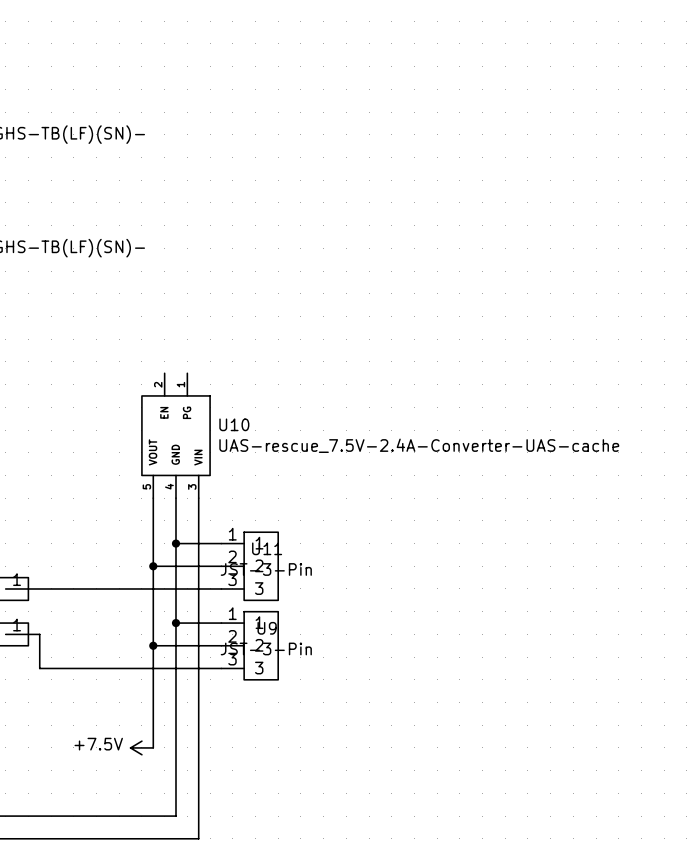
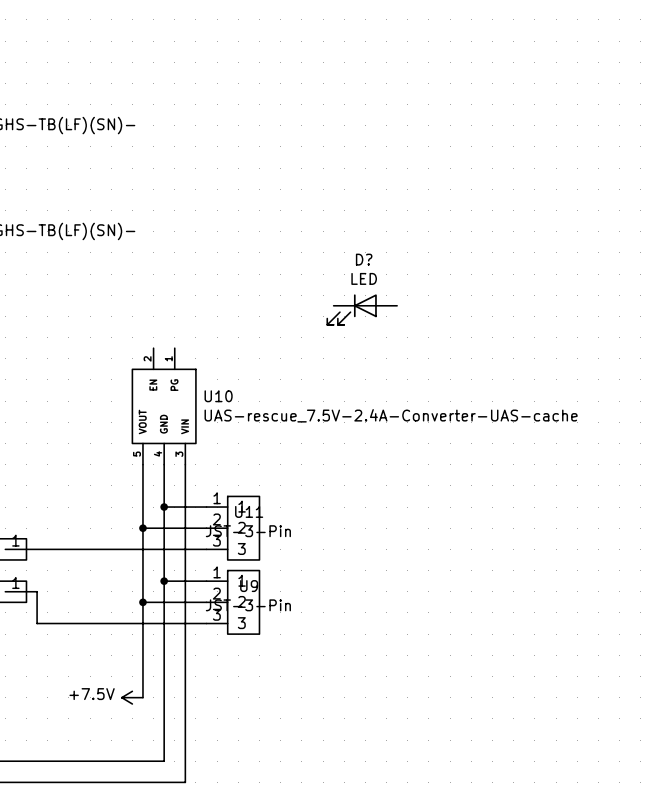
D?: none -> LED (362, 309)

